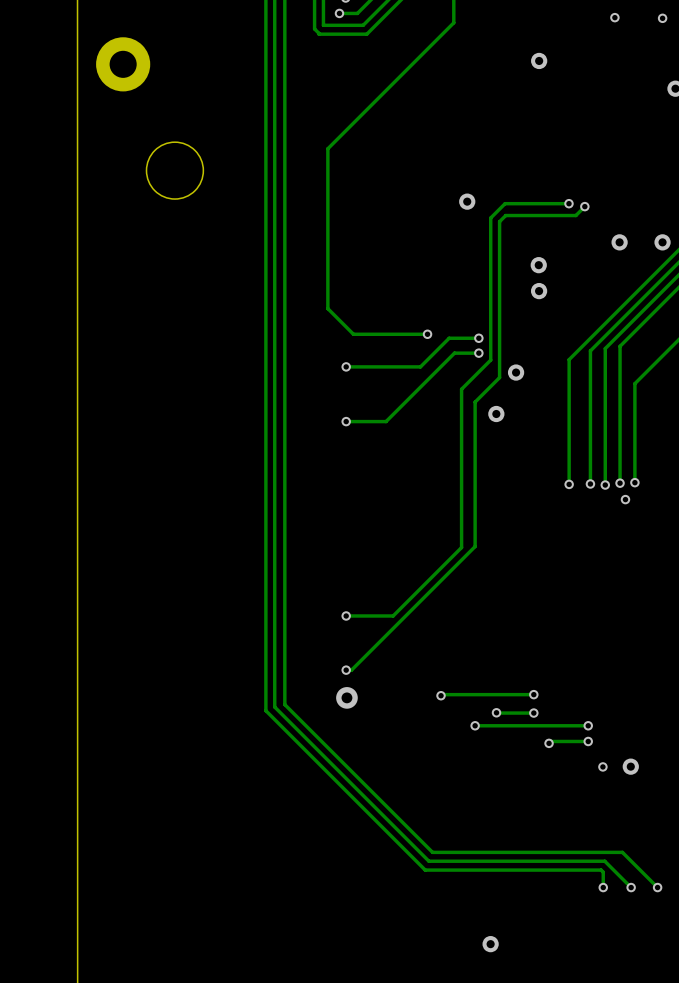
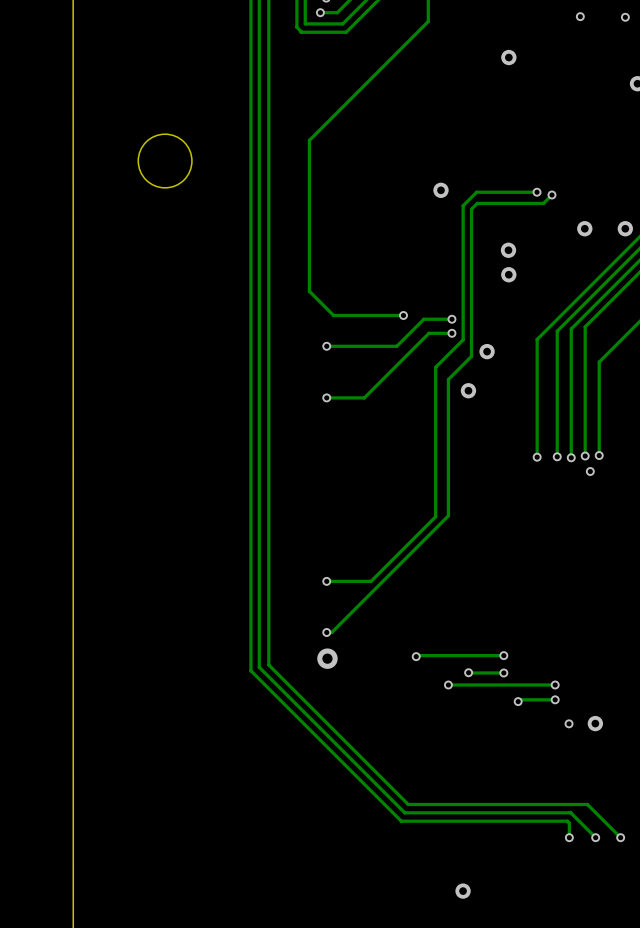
part: (123, 64) -> none

